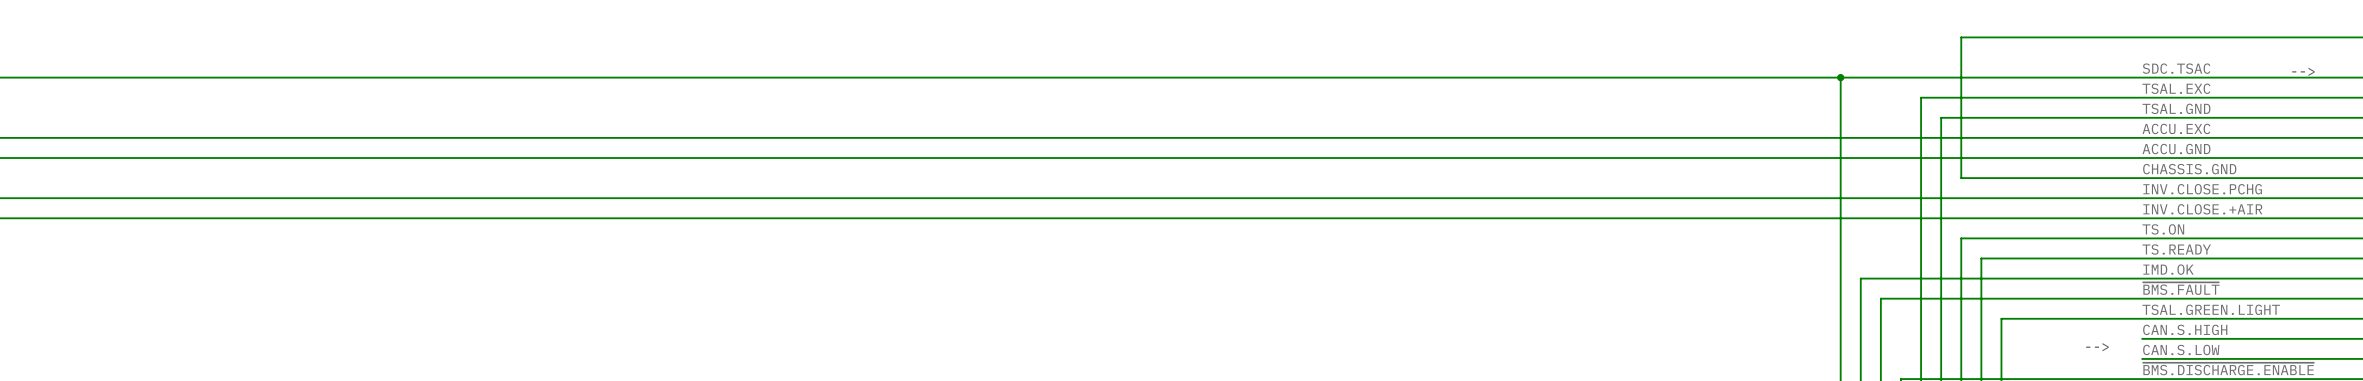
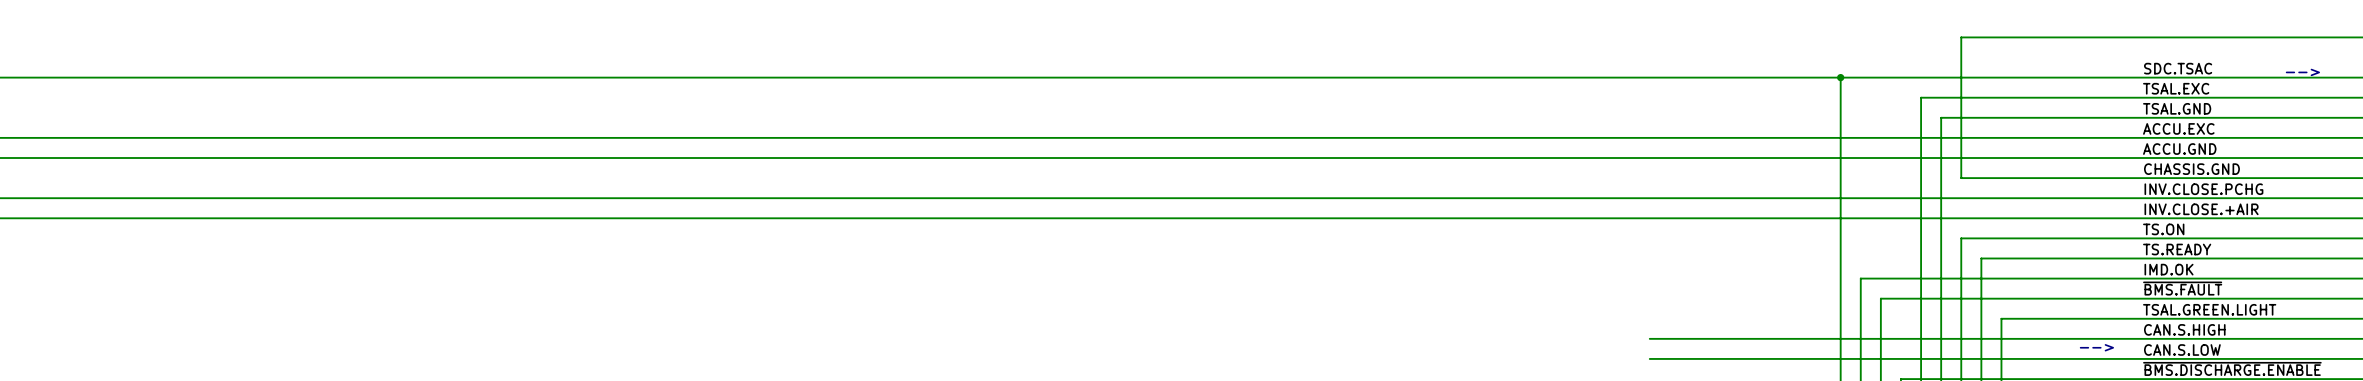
wire: none -> (1649, 338) (2142, 338)
wire: none -> (1649, 358) (2142, 358)

